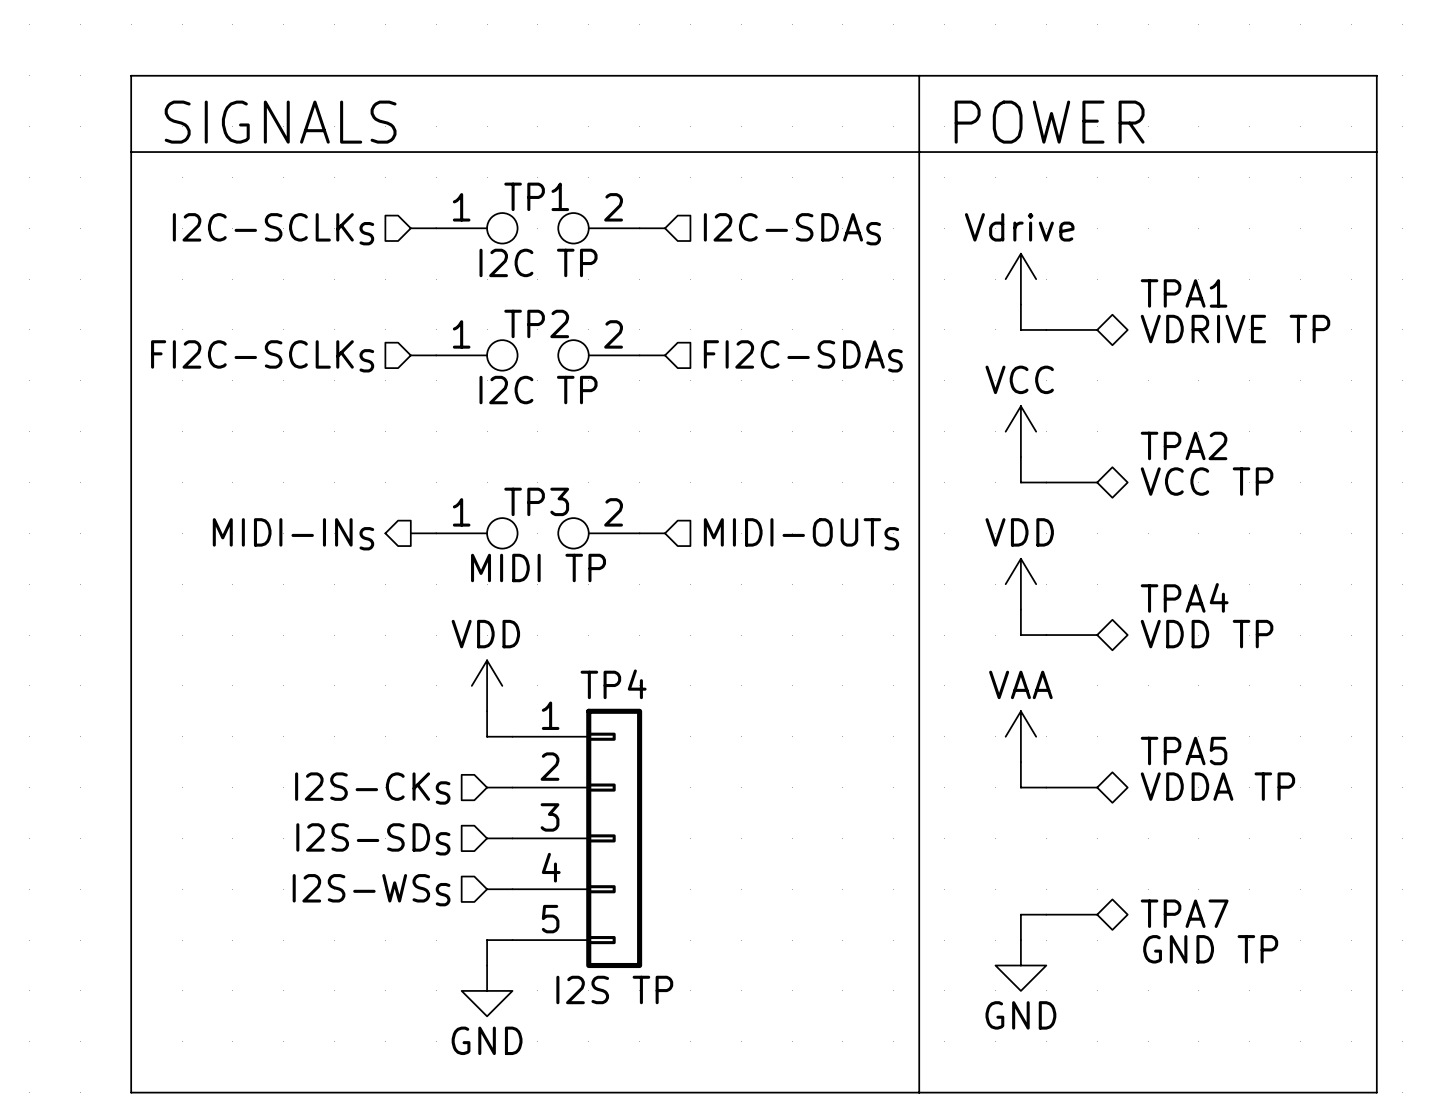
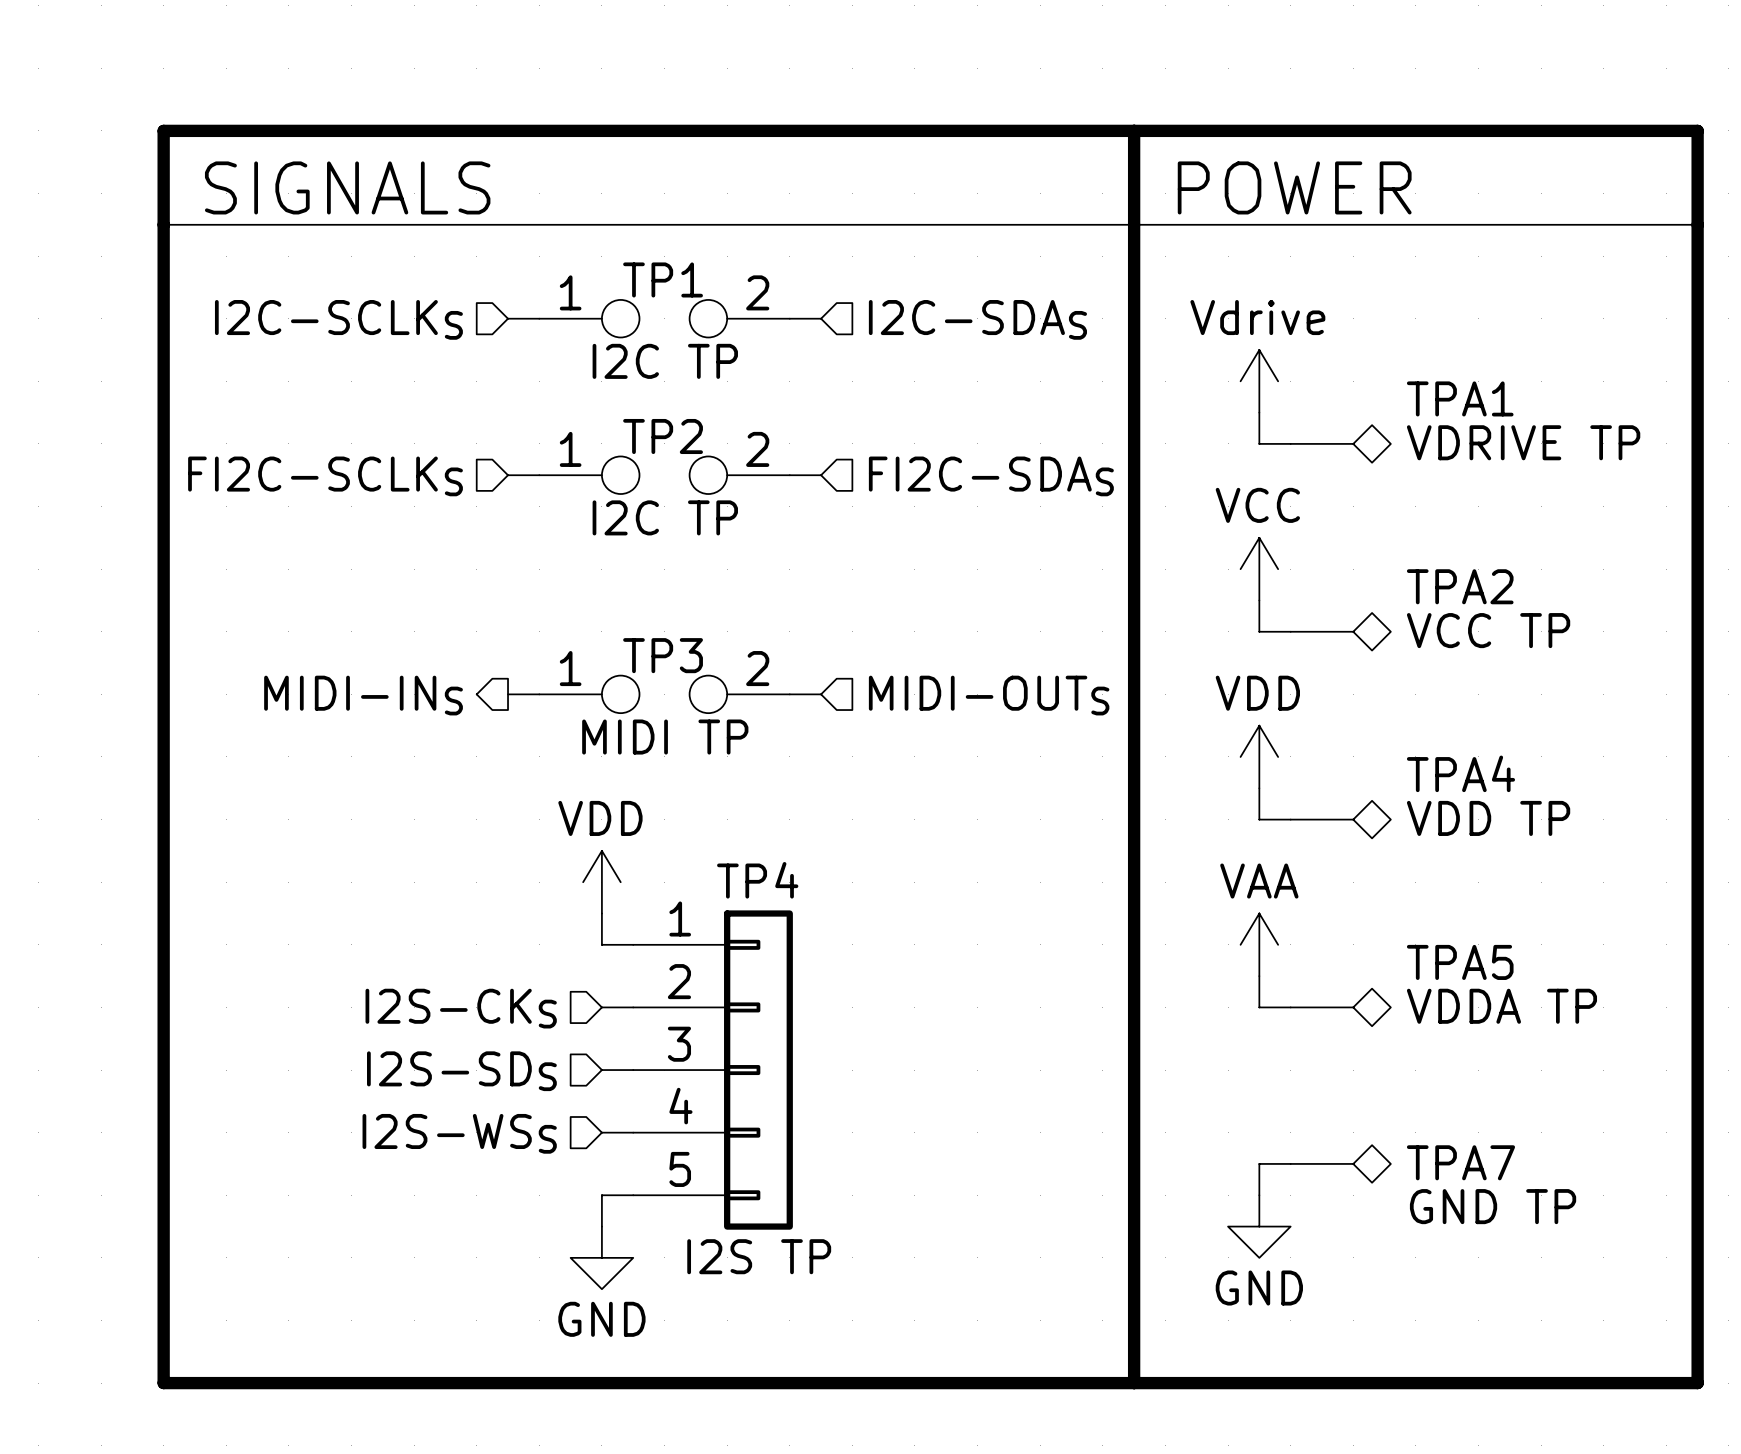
line width: thin (131, 75) (131, 1092) (1376, 1092) (1376, 75) (131, 75) -> thick (163, 130) (163, 1383) (1697, 1383) (1697, 130) (163, 130)
line width: thin (919, 75) (919, 1092) -> thick (1134, 130) (1134, 1383)

